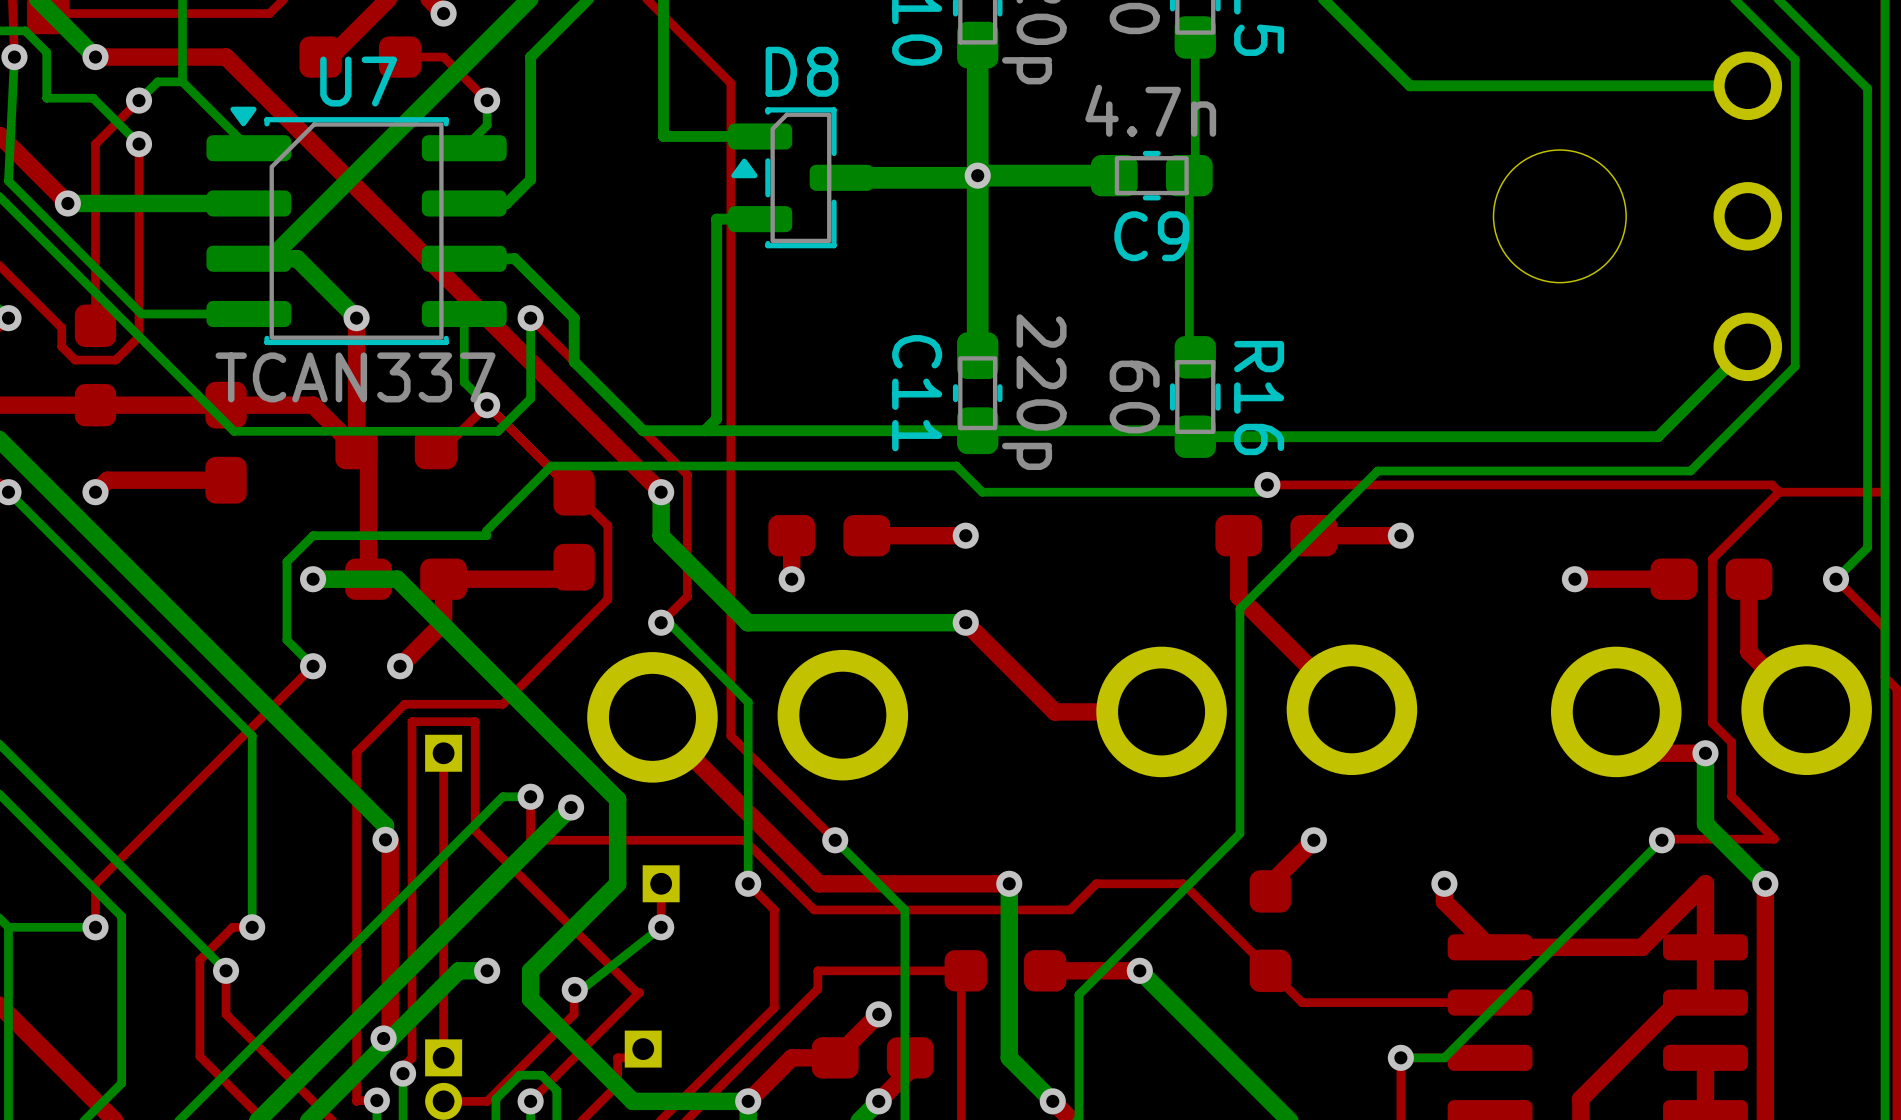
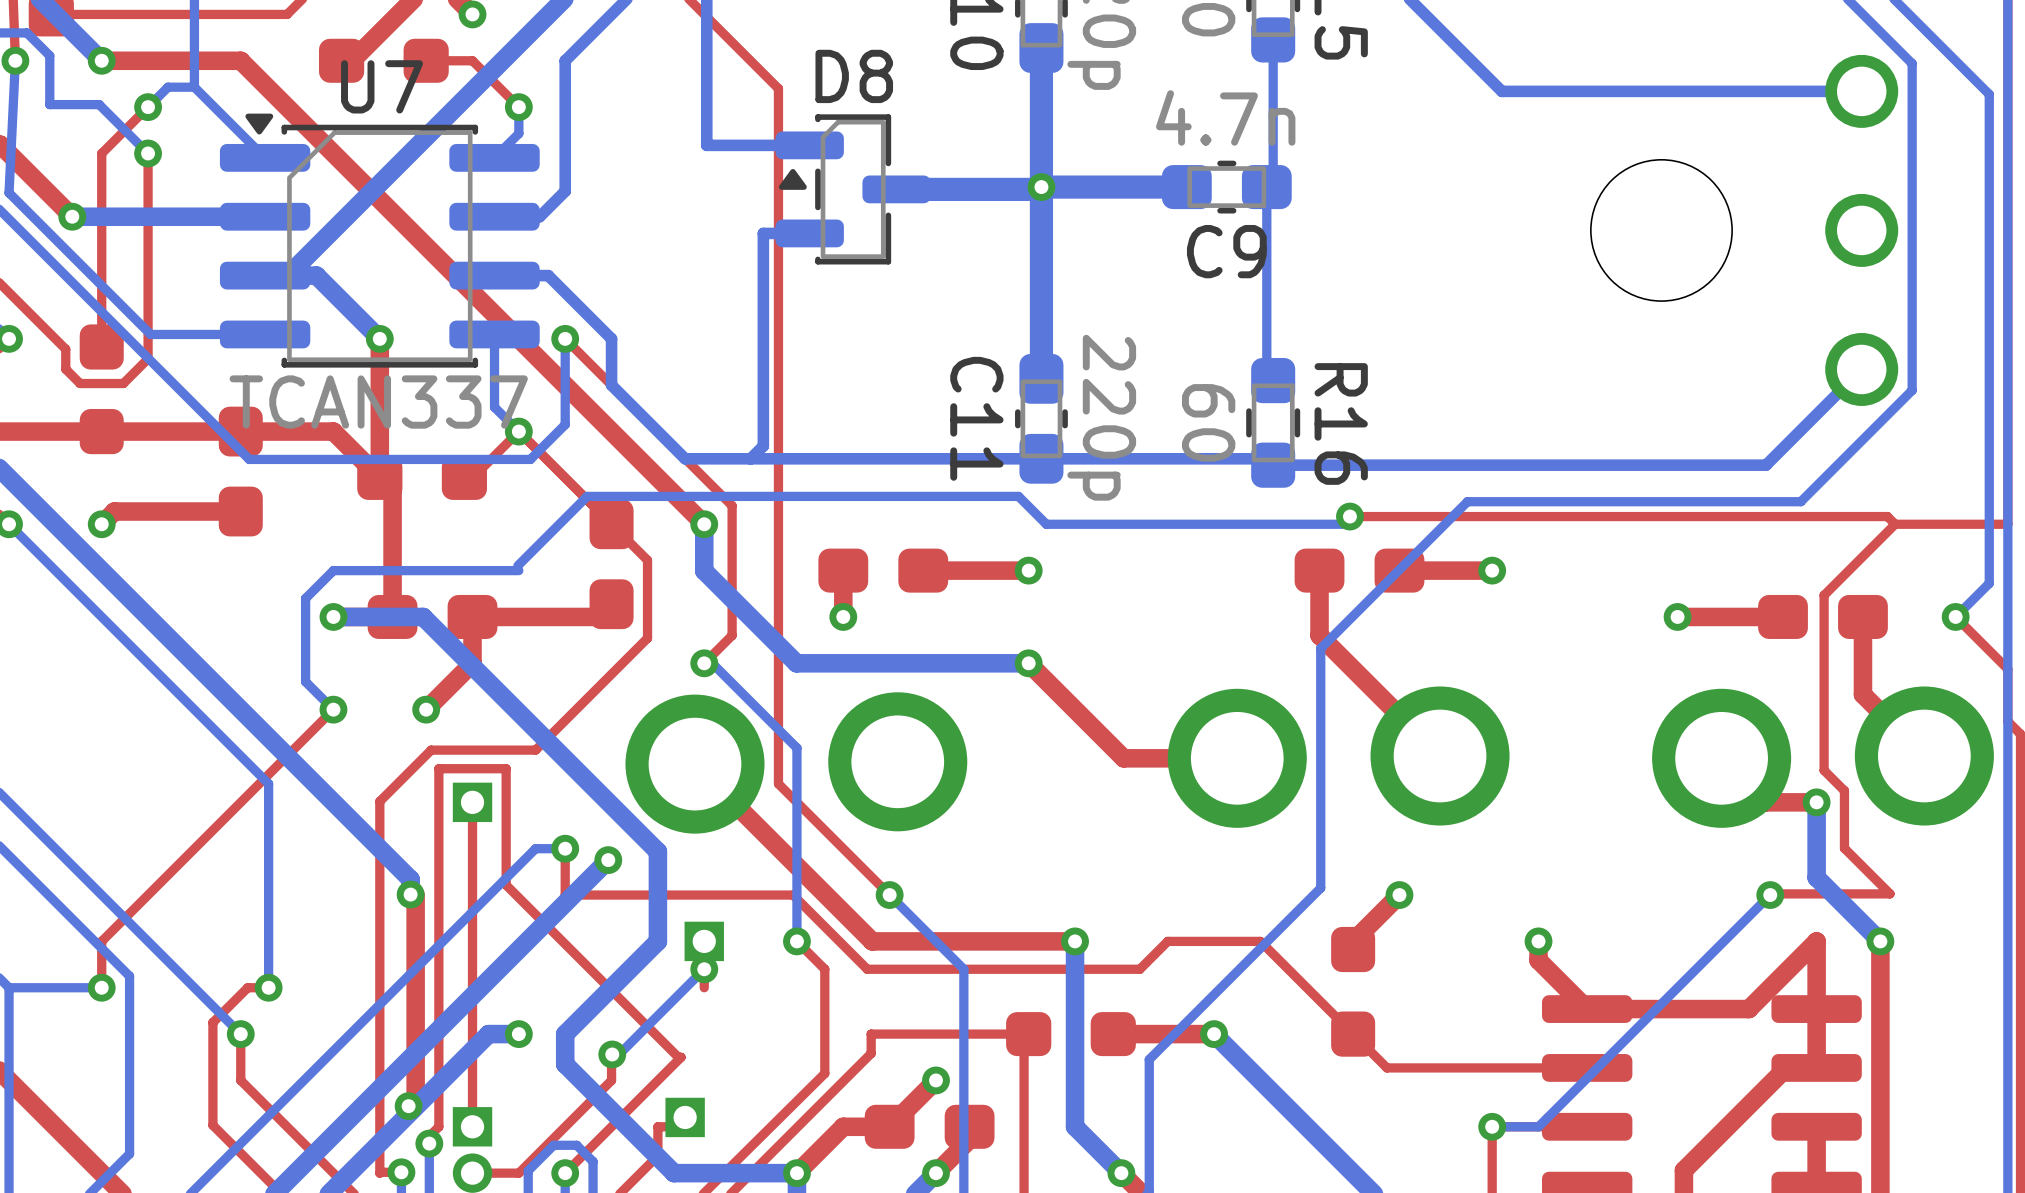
bottom track: (661, 927) (581, 989) -> (704, 969) (619, 1054)
via position: (661, 927) -> (704, 969)

